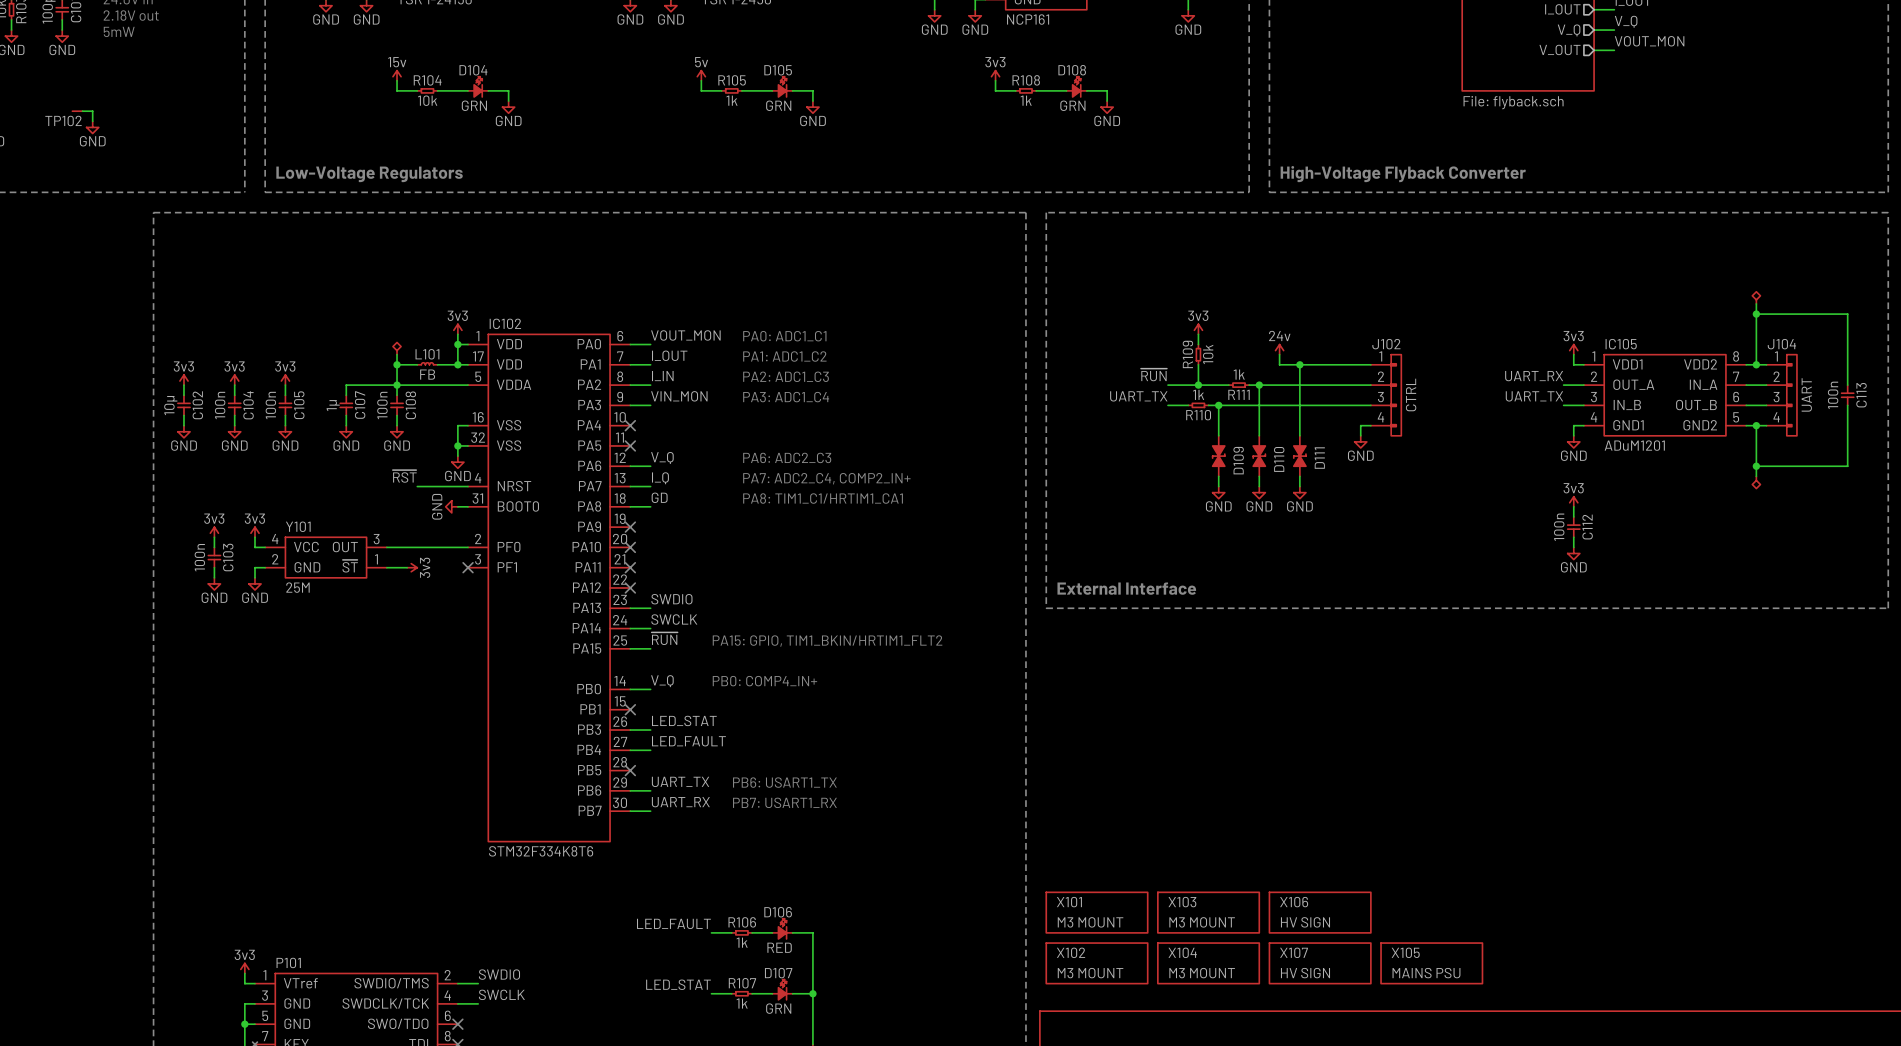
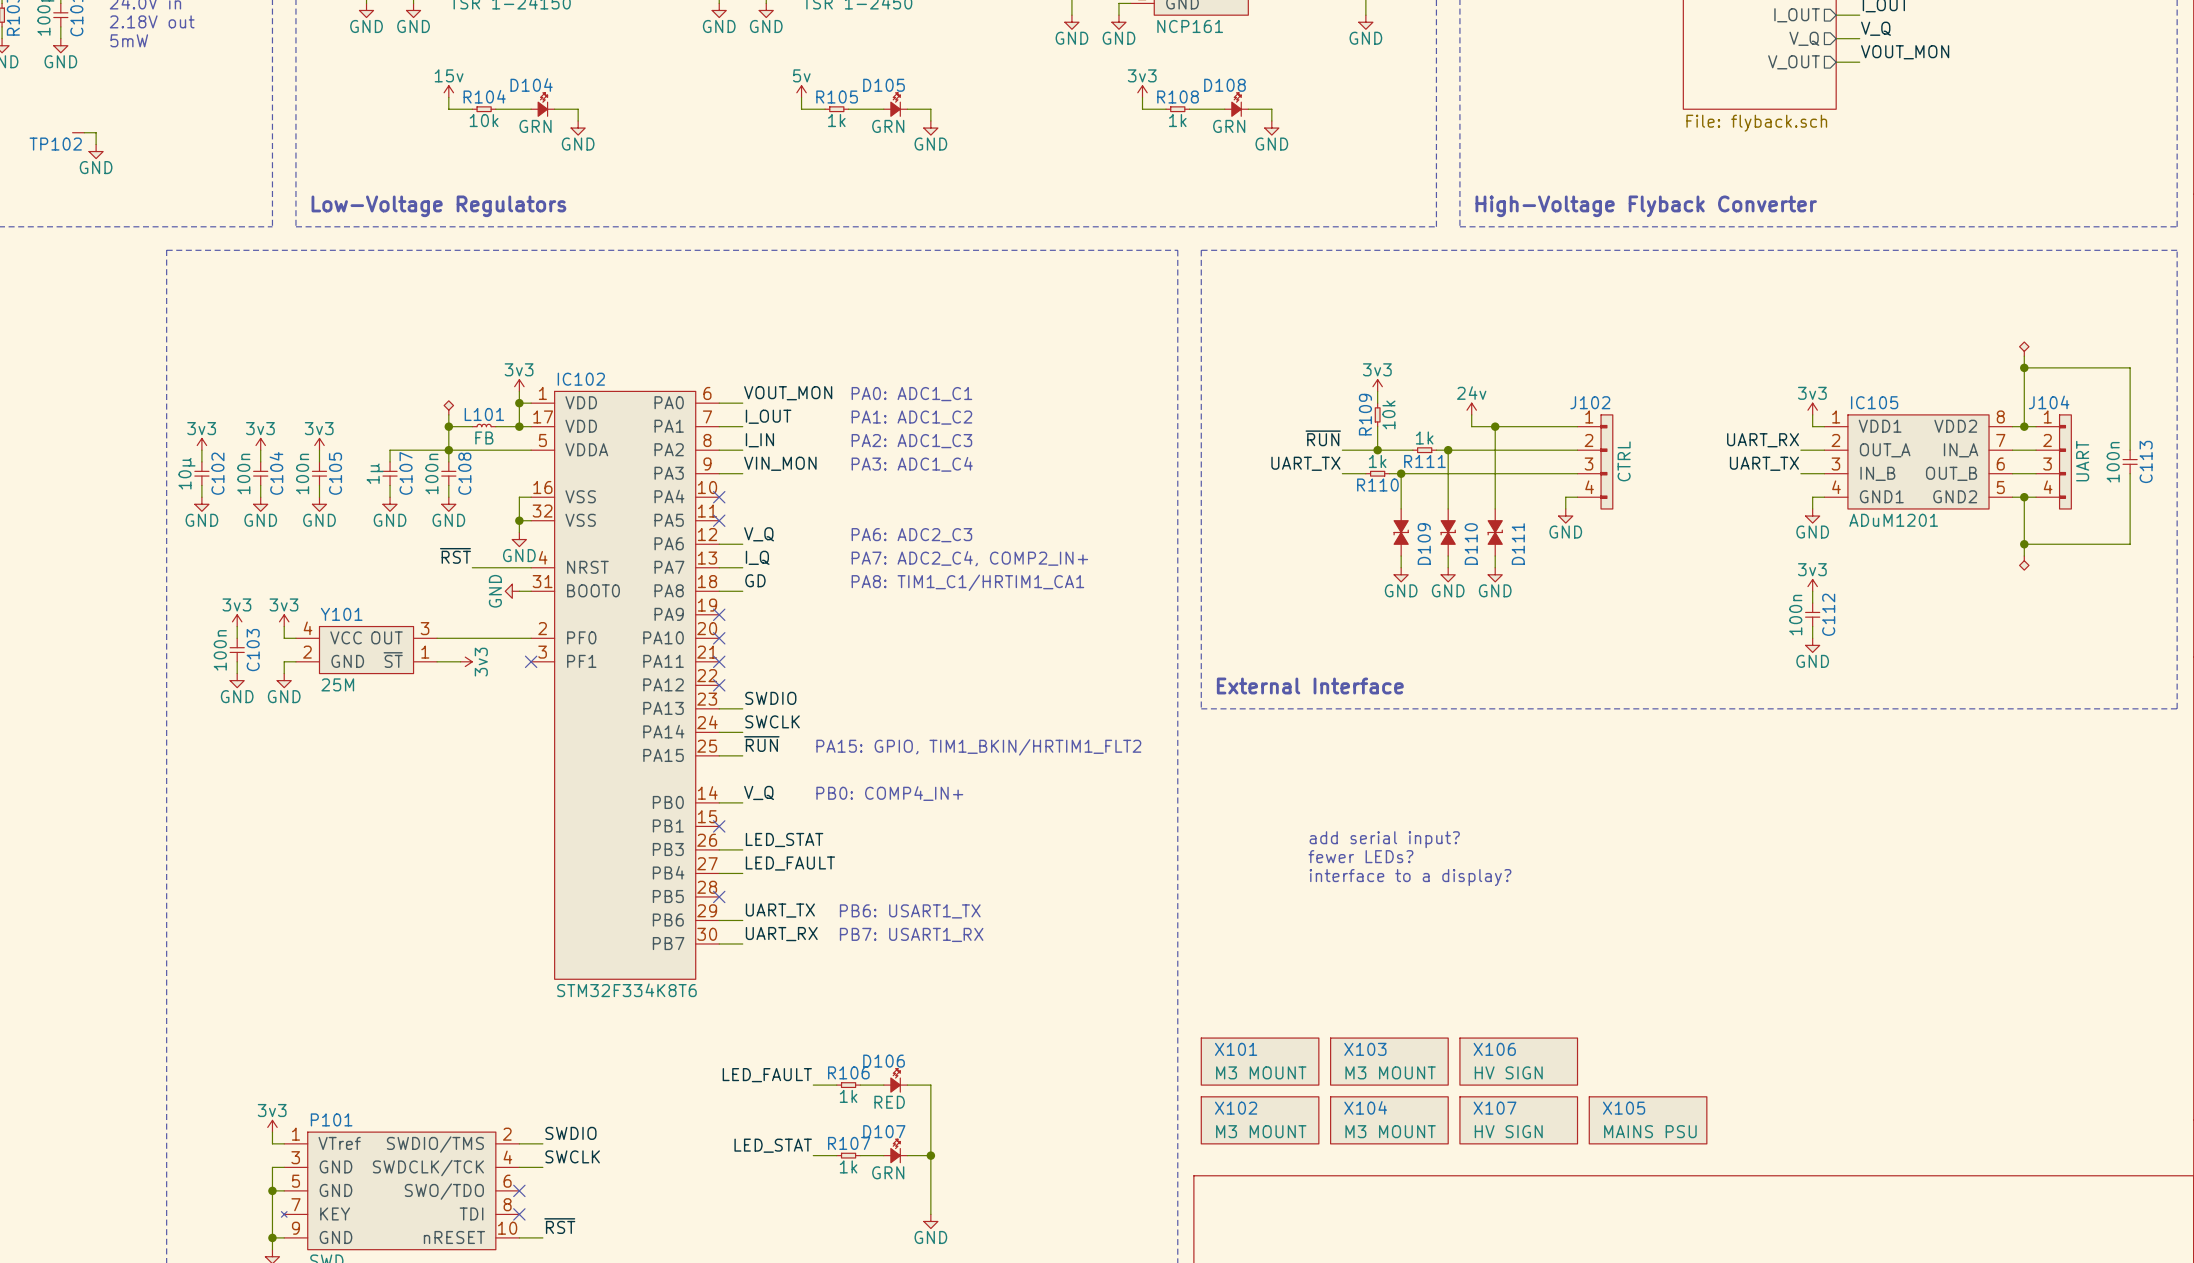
text: none -> add serial input? (1384, 839)
text: none -> fewer LEDs? (1360, 856)
text: none -> interface to a display? (1410, 877)

